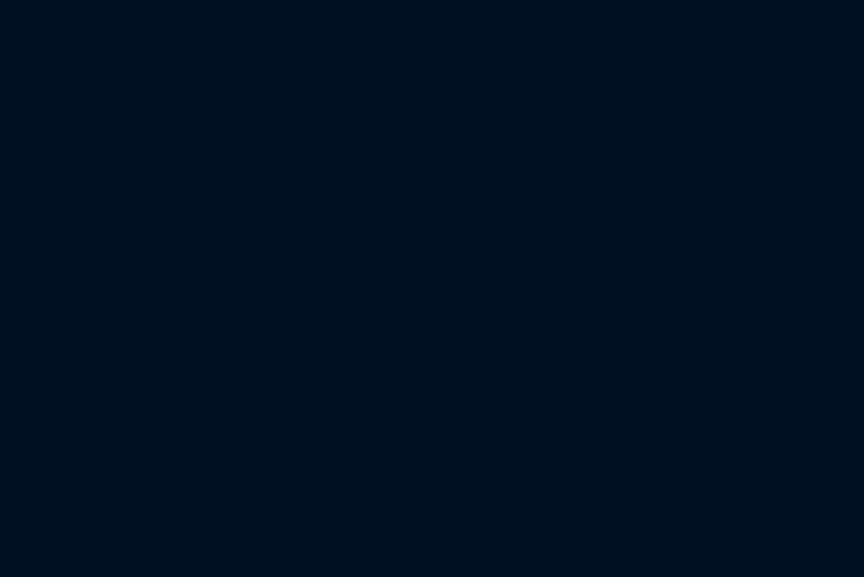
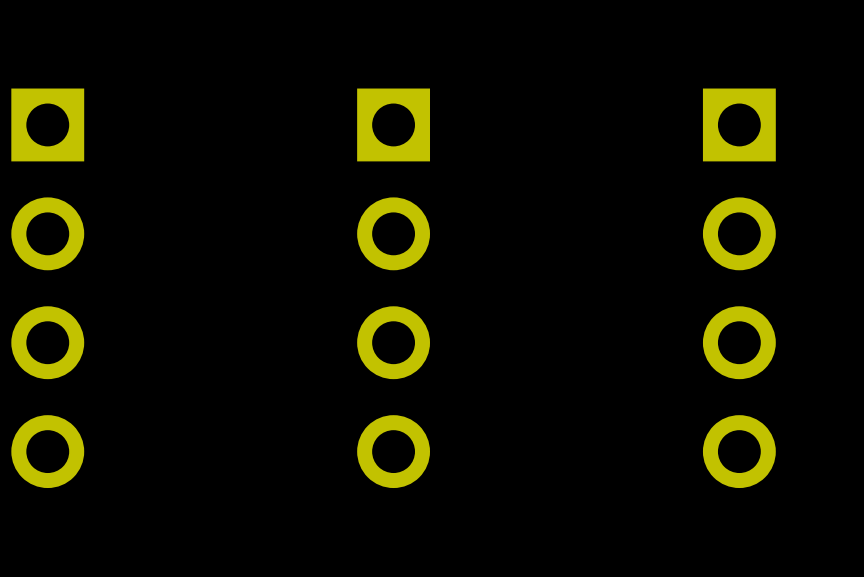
part: none -> (47, 288)
part: none -> (393, 288)
part: none -> (739, 288)

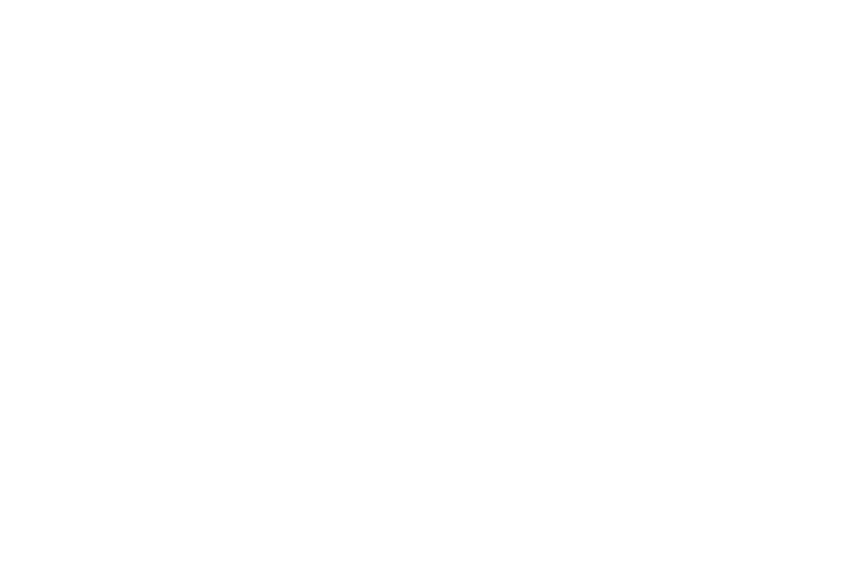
part: (47, 288) -> none
part: (393, 288) -> none
part: (739, 288) -> none

